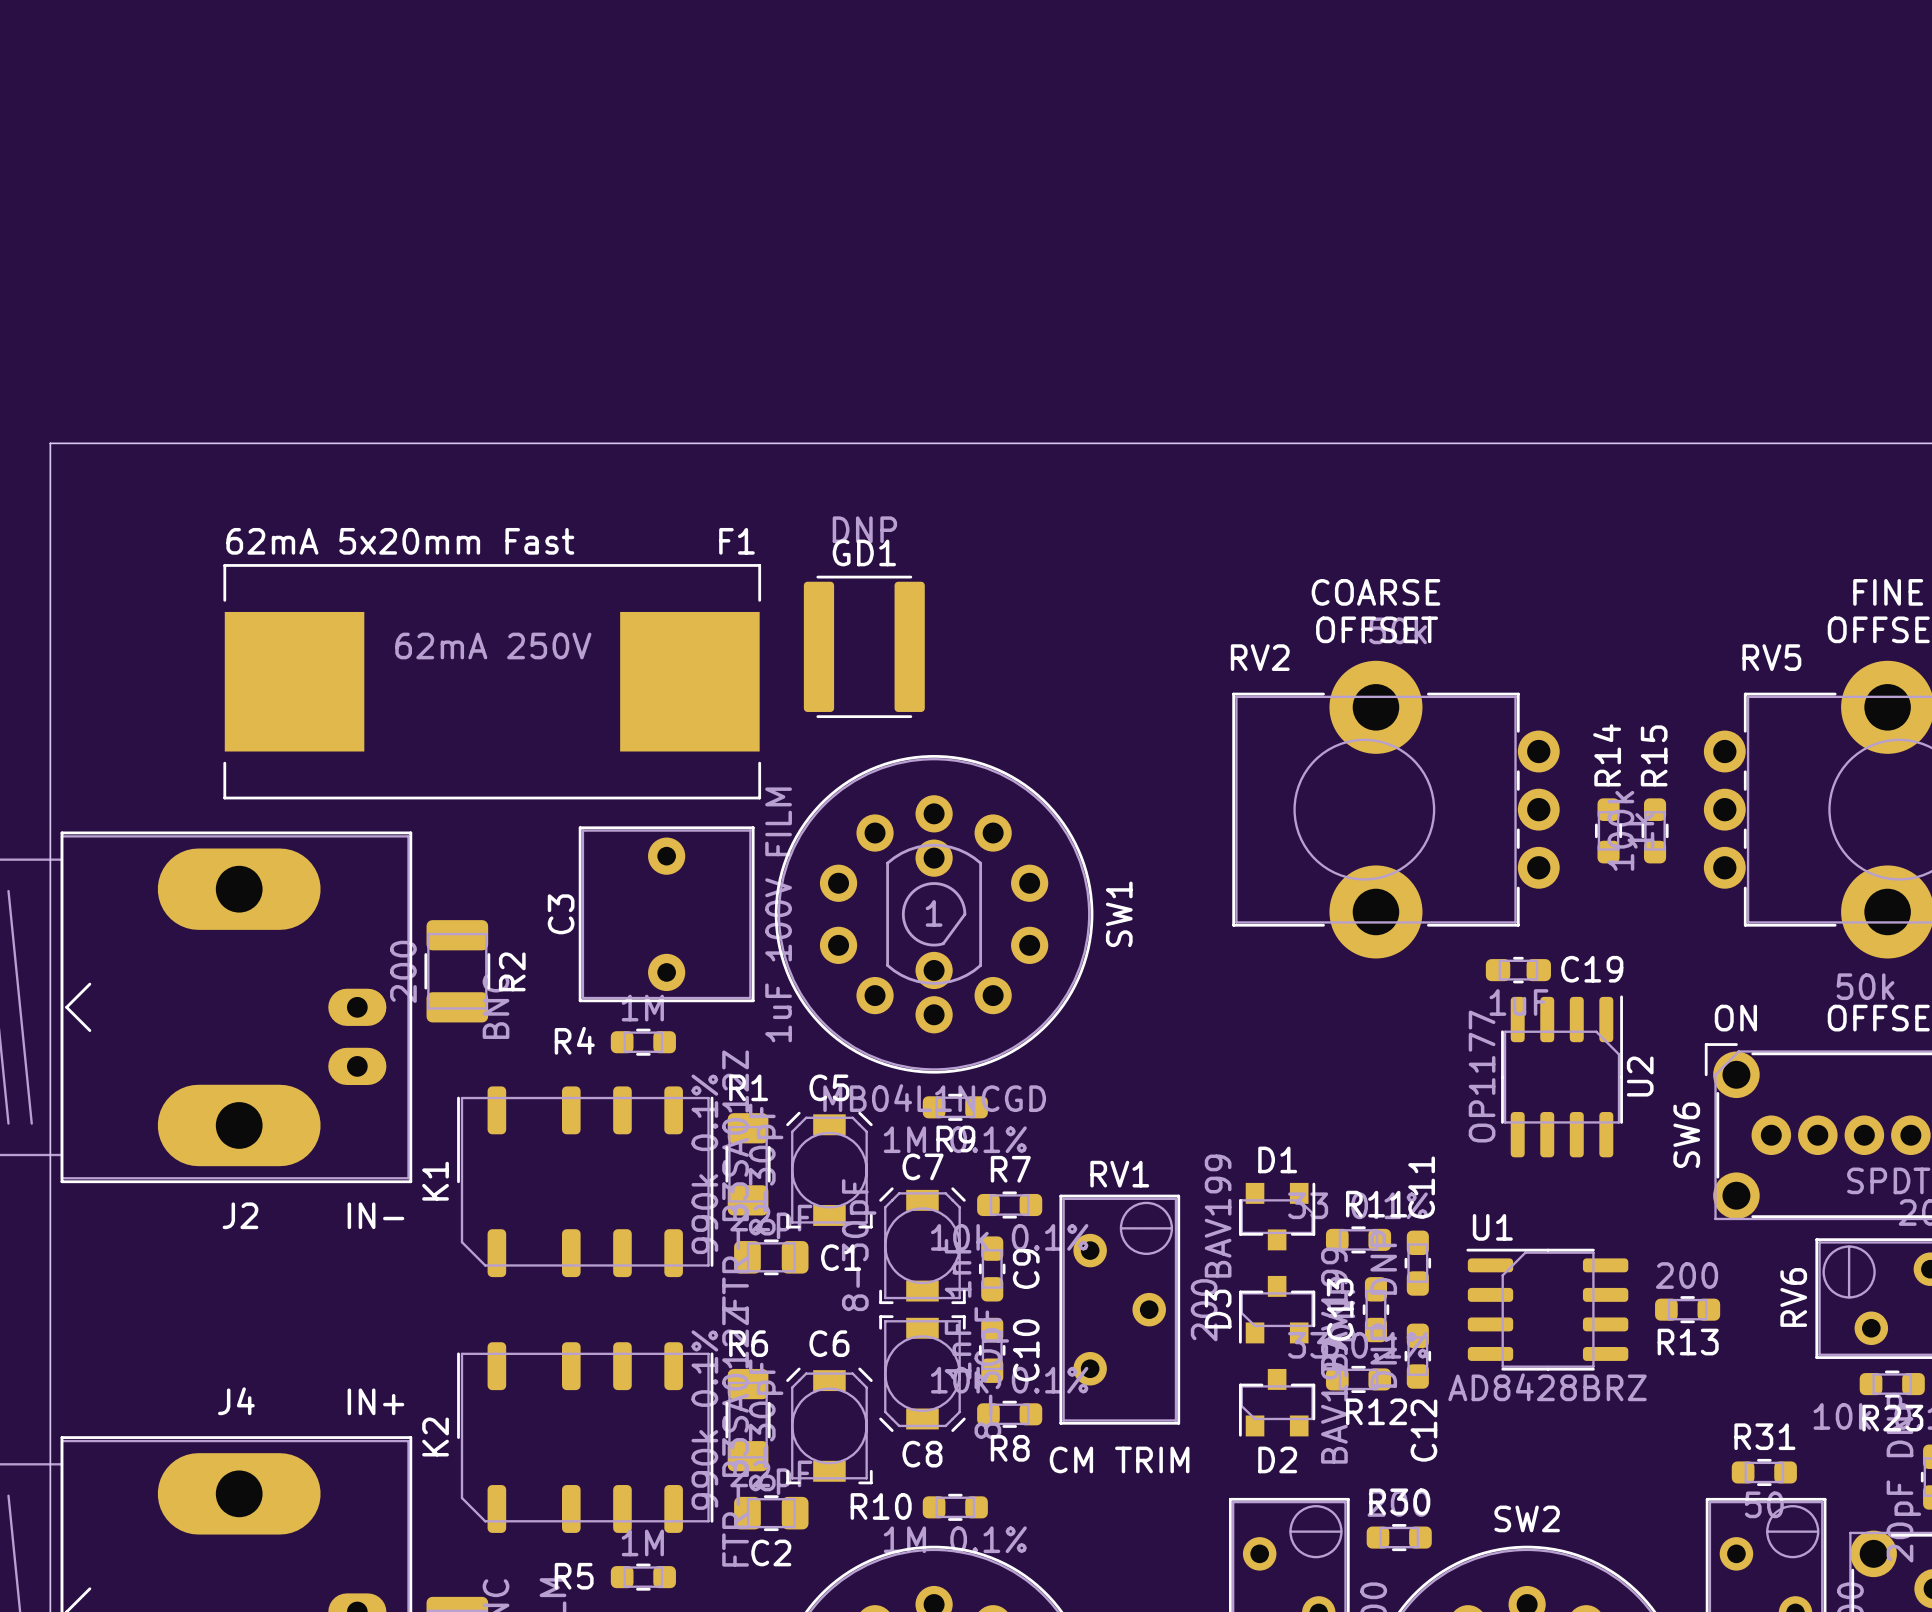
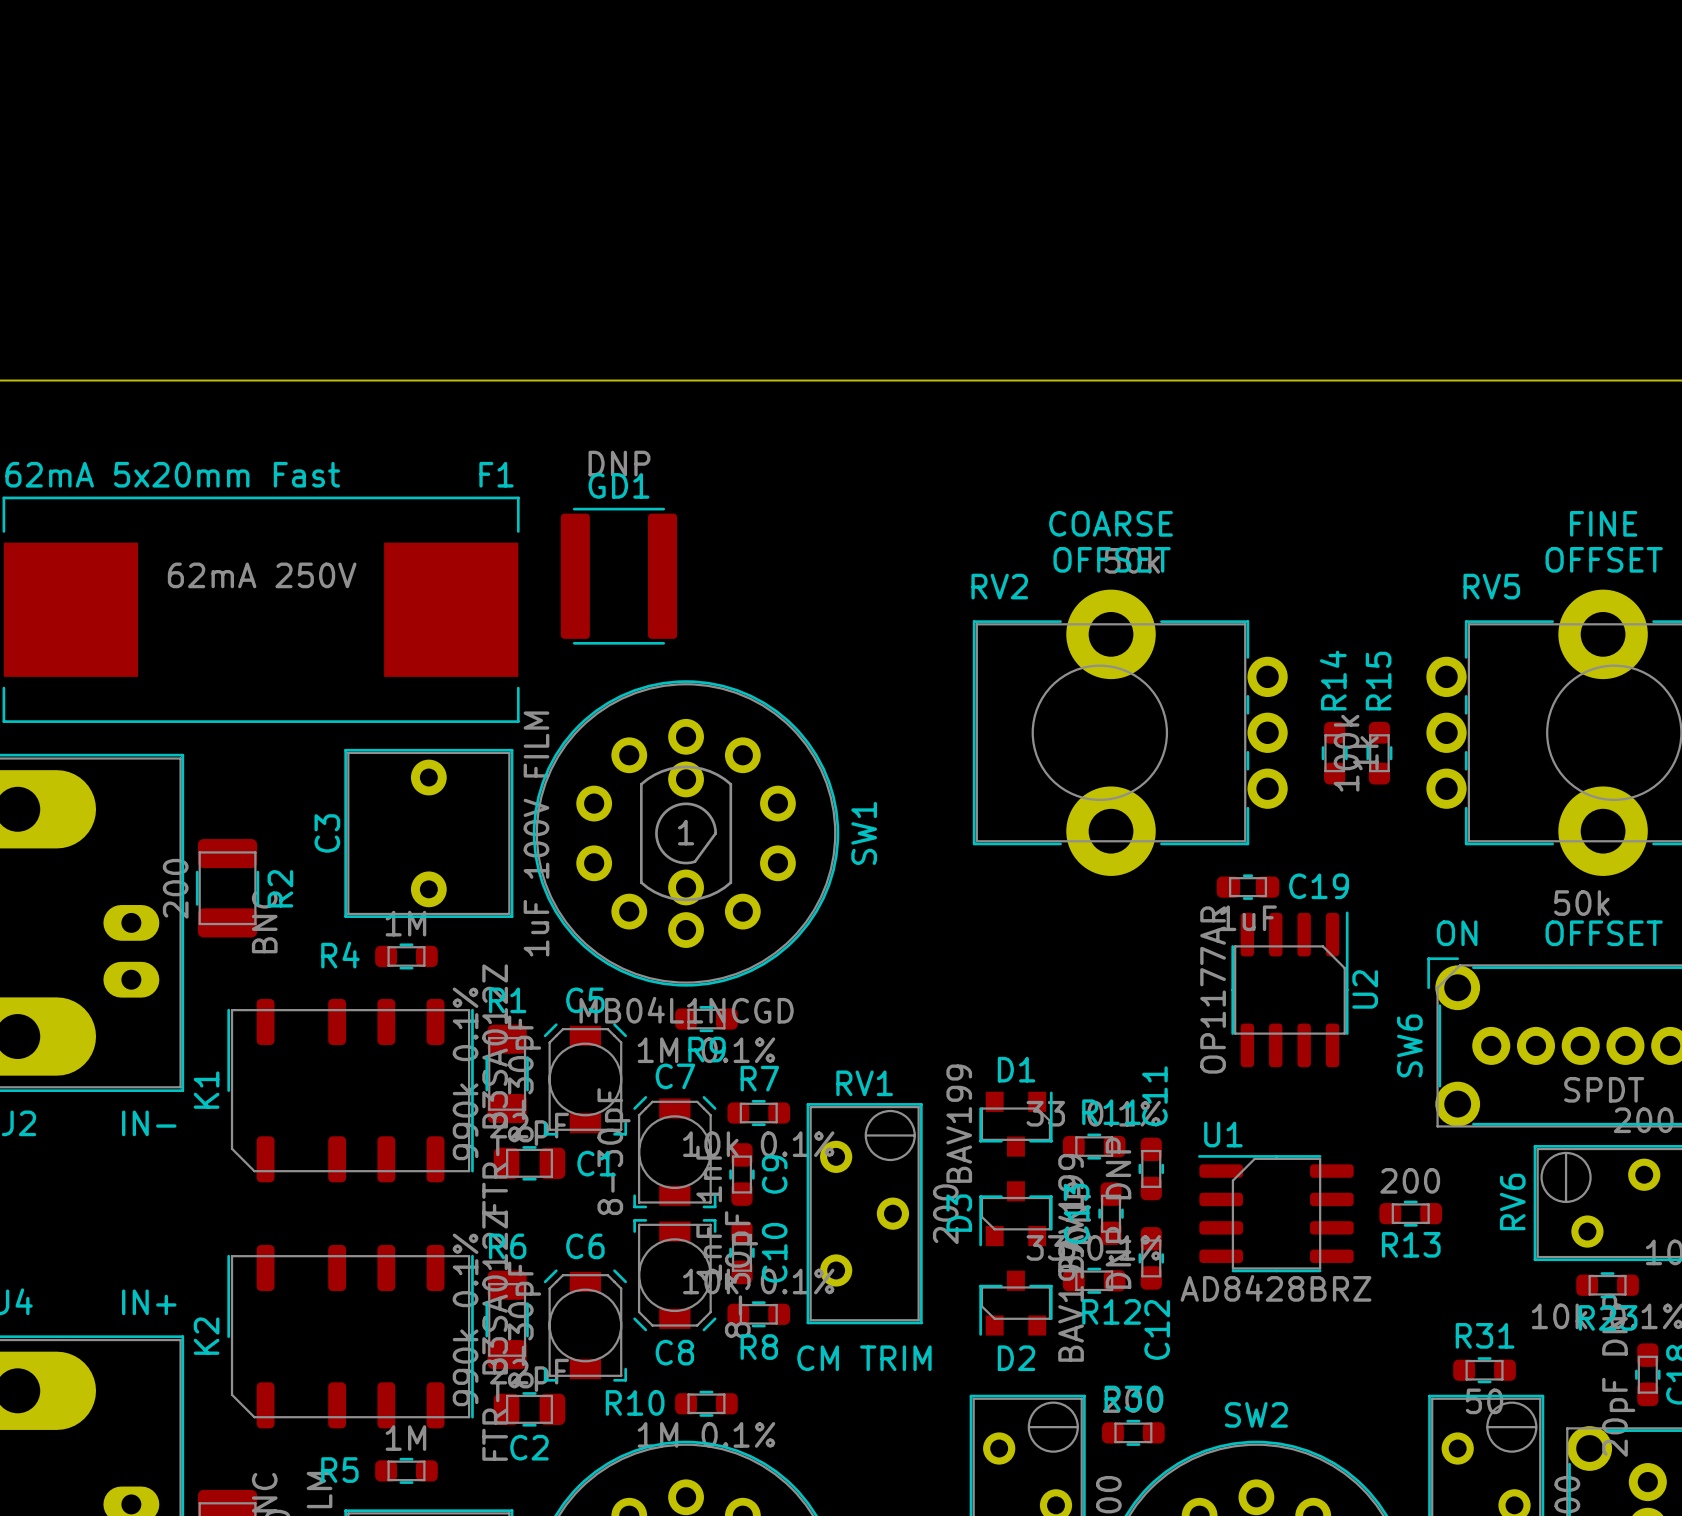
U2 value: OP1177 (1482, 1076) -> OP1177AR (1213, 990)

